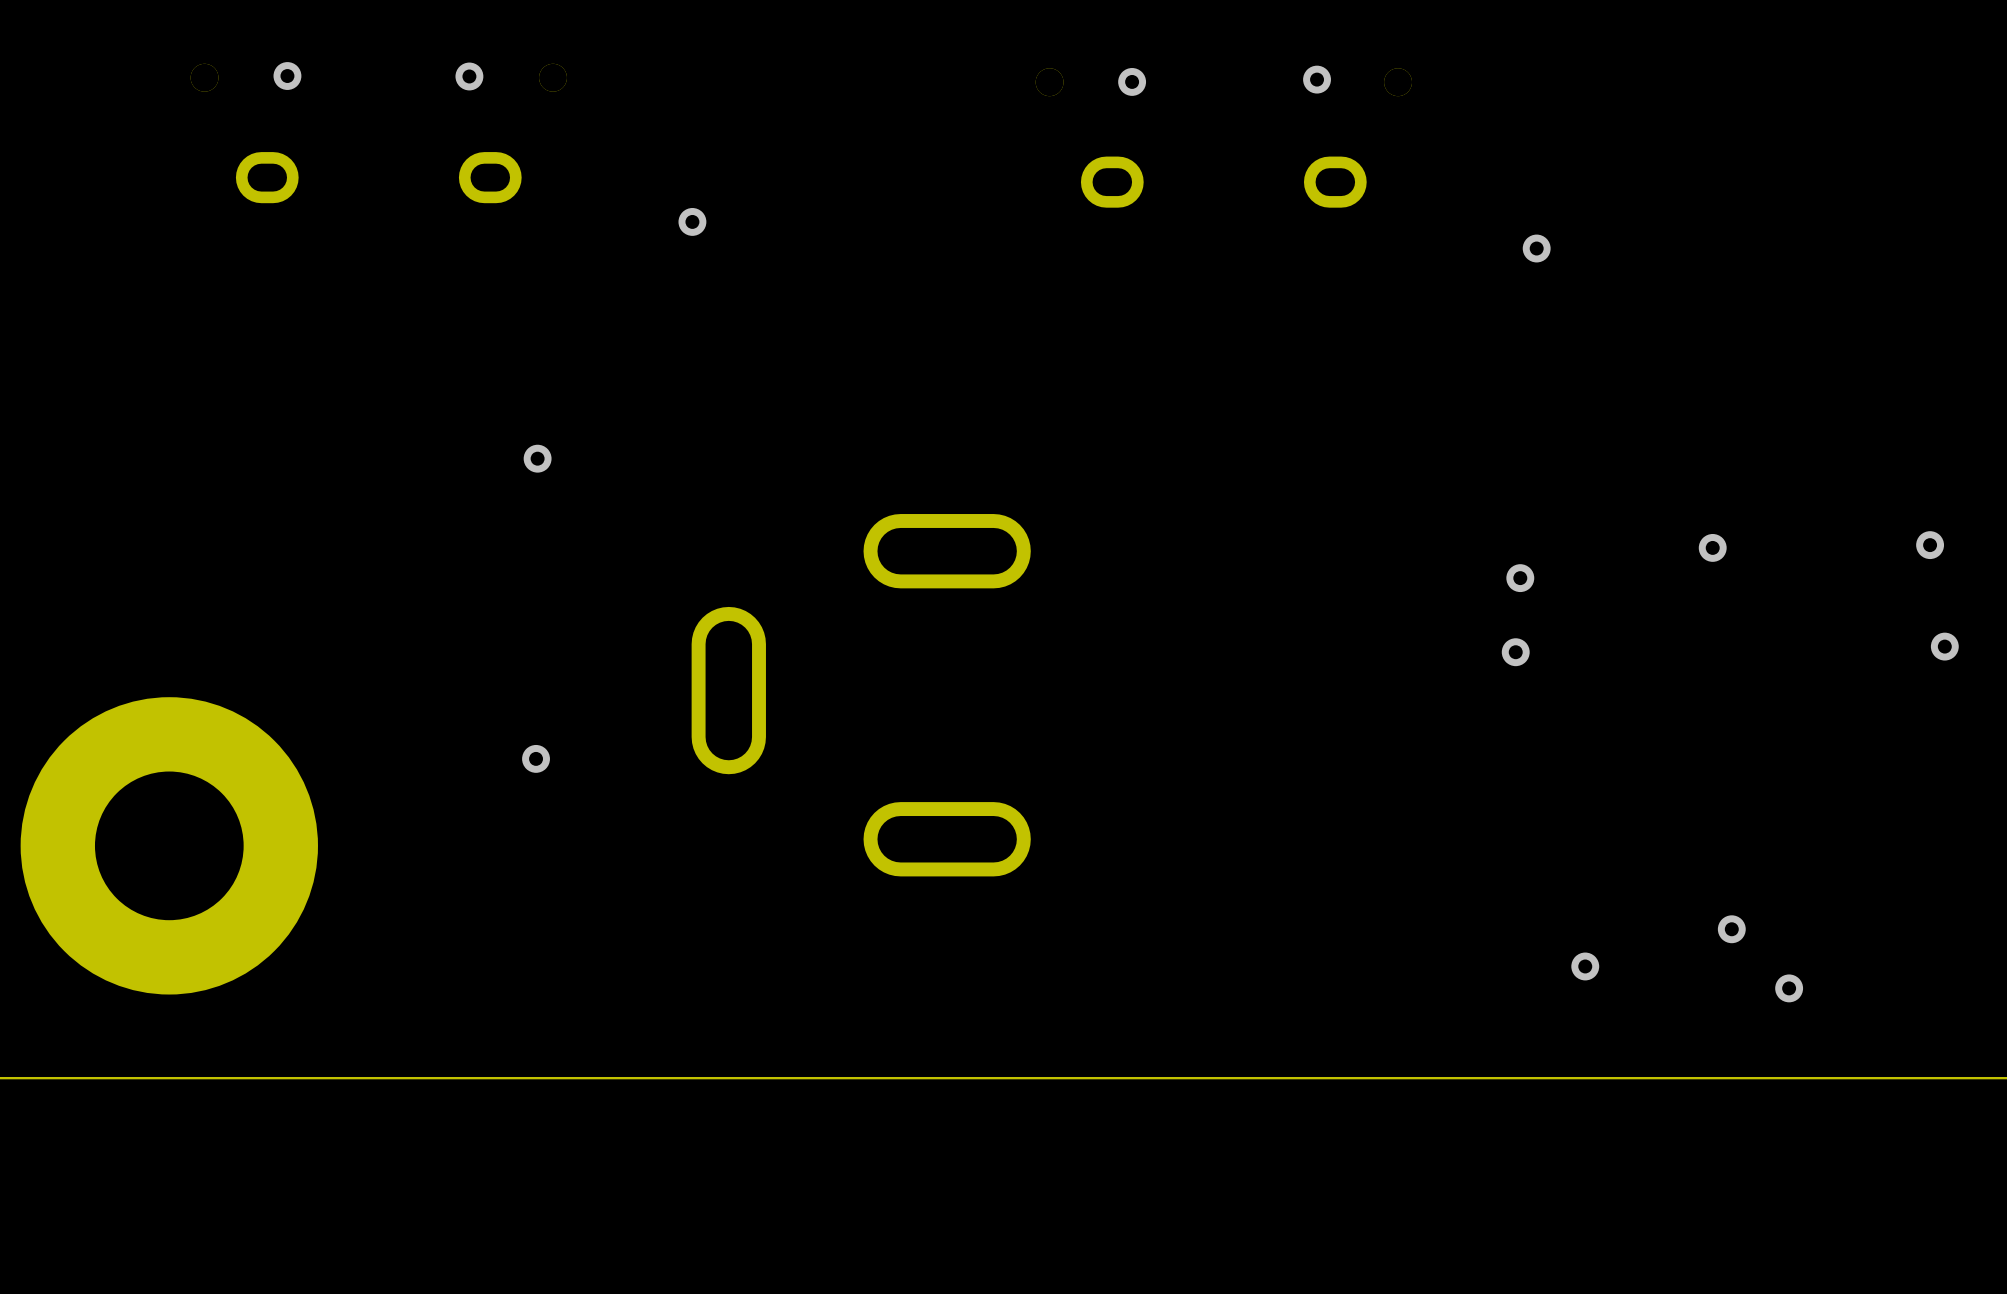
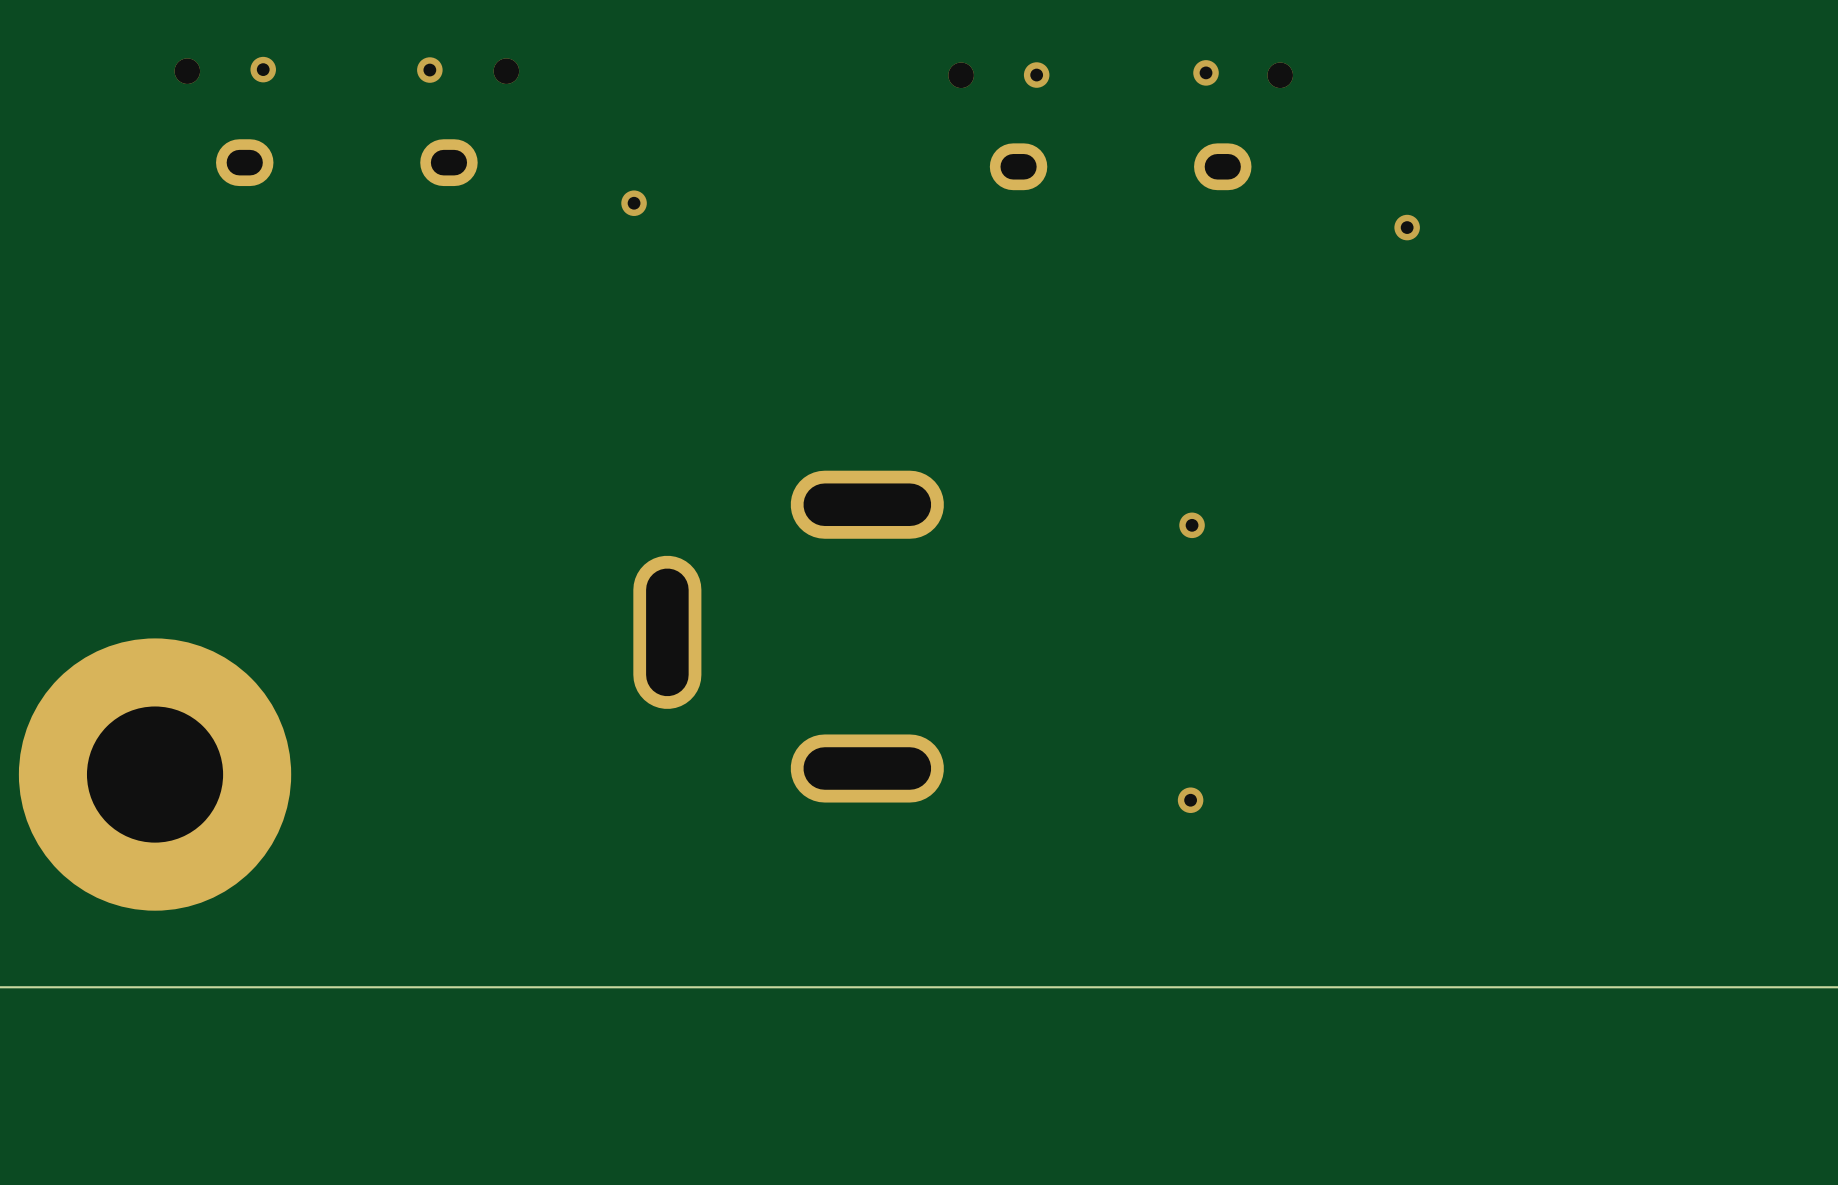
via: (537, 458) -> none
via: (1930, 545) -> none
via: (1712, 547) -> none
via: none -> (1192, 525)
via: (1520, 578) -> none
via: (1944, 646) -> none
via: (1515, 652) -> none
via: (536, 758) -> none
via: none -> (1190, 800)
via: (1731, 929) -> none
via: (1585, 966) -> none
via: (1789, 988) -> none

